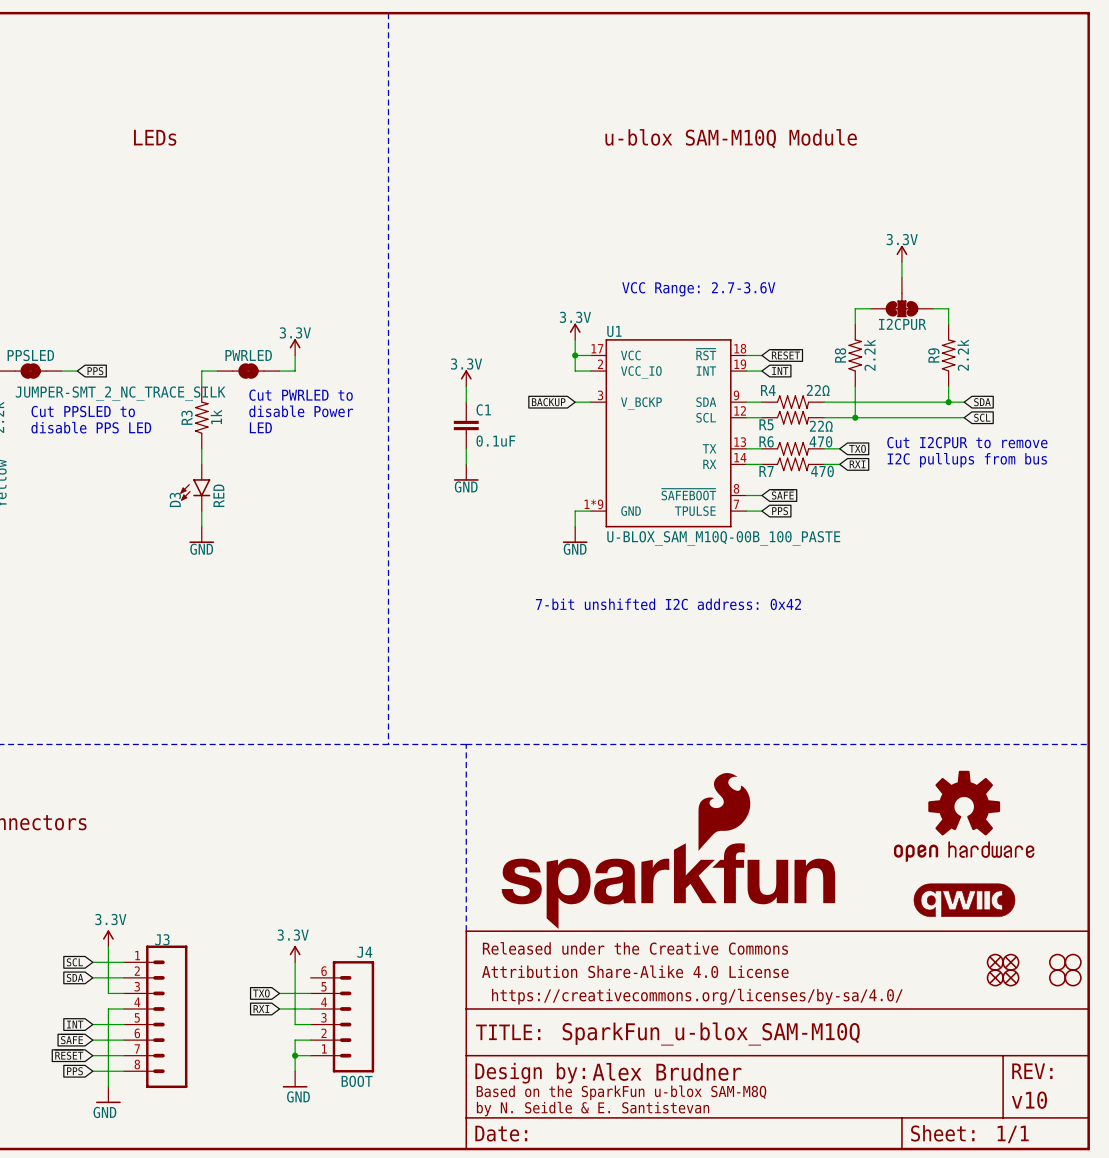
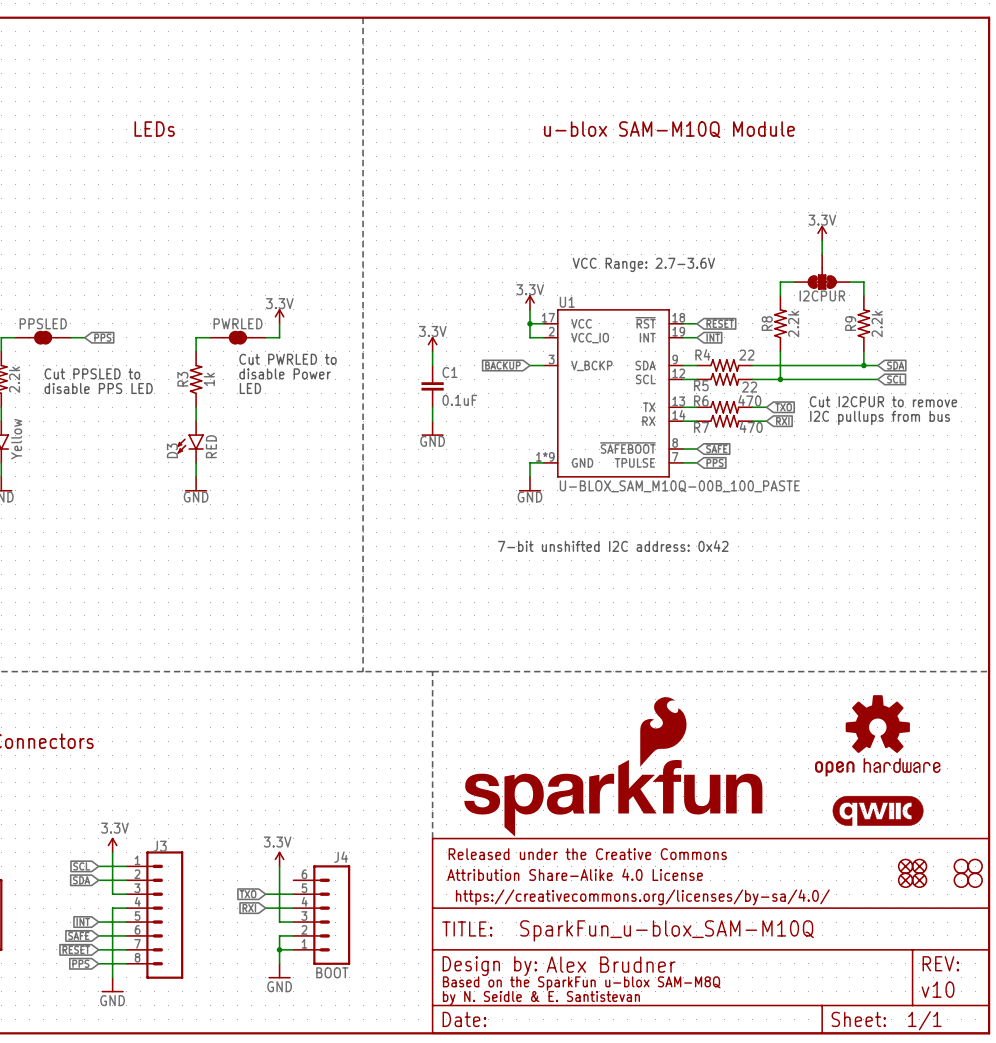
R4 value: 22Ω (818, 390) -> 22 (746, 355)
PPSLED value: JUMPER-SMT_2_NC_TRACE_SILK (120, 393) -> none
R5 value: 22Ω (821, 426) -> 22 (749, 387)

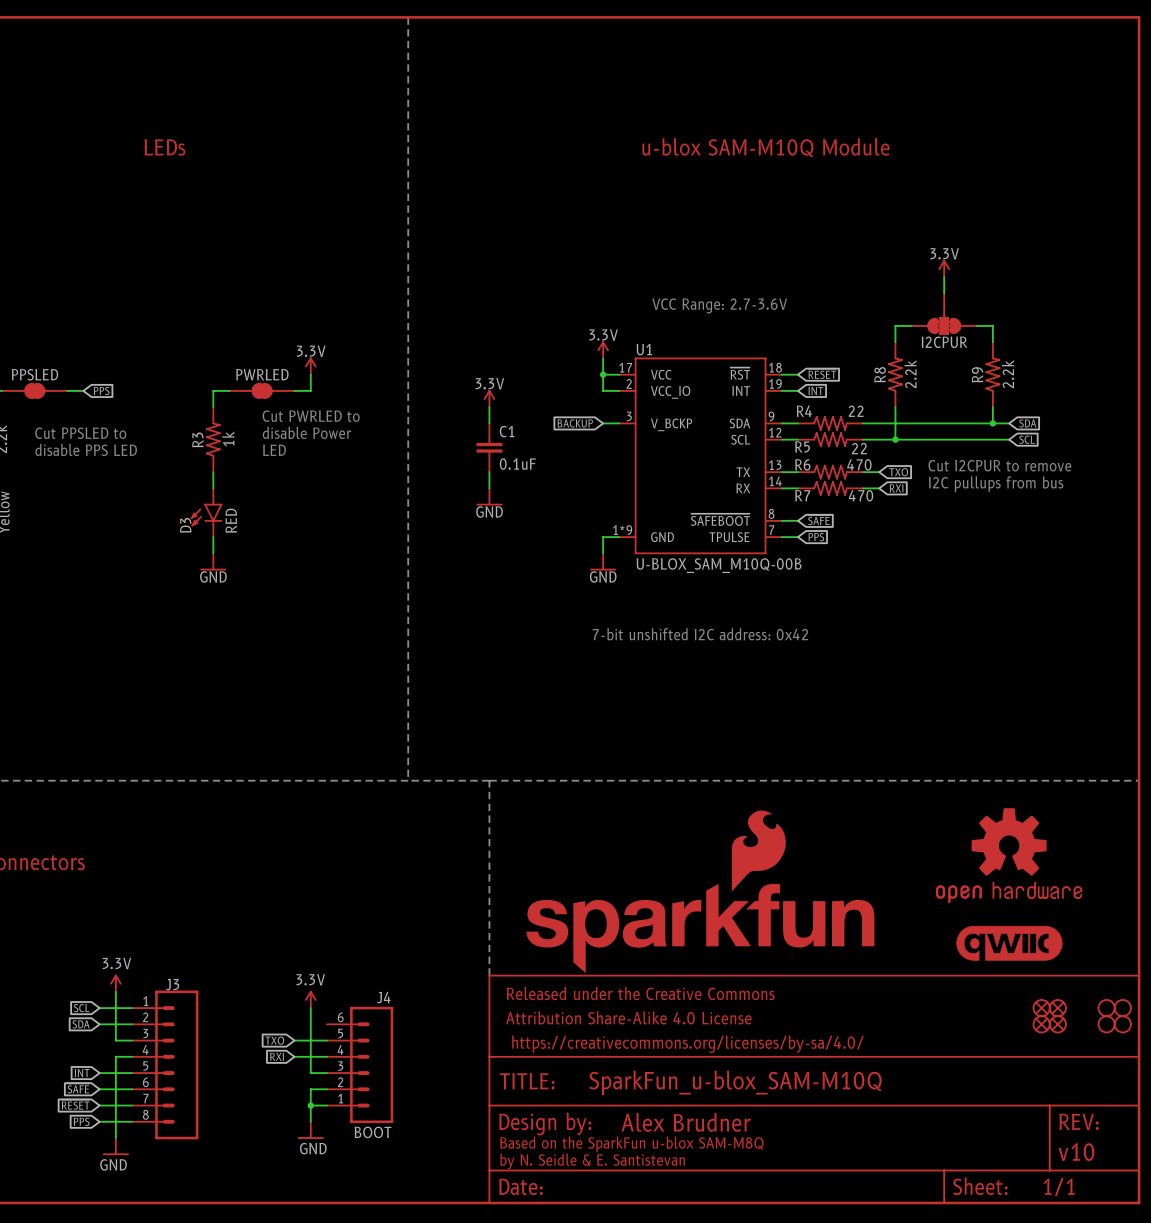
U1 value: U-BLOX_SAM_M10Q-00B_100_PASTE (679, 486) -> U-BLOX_SAM_M10Q-00B (719, 565)

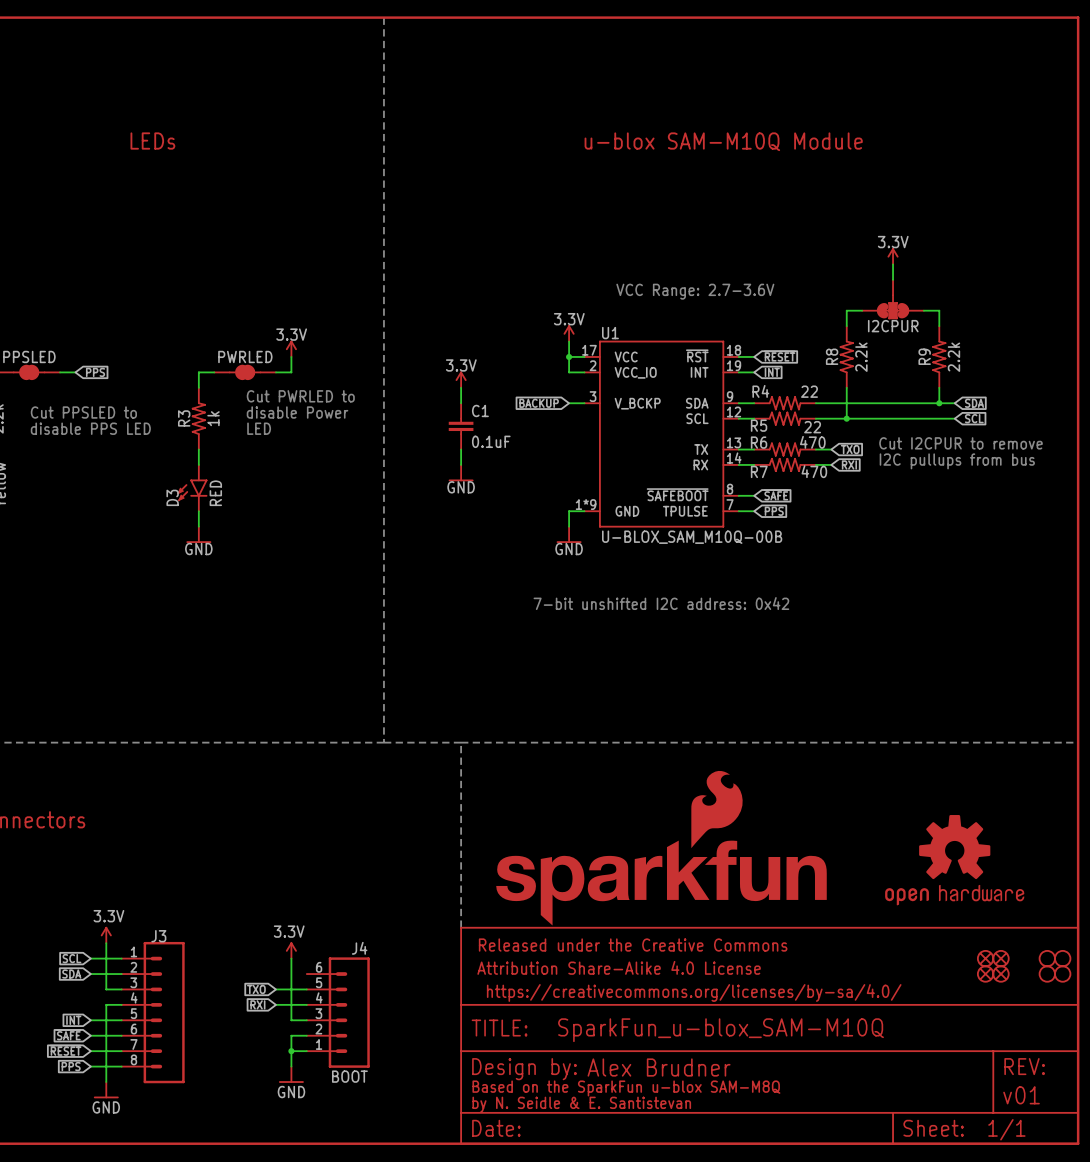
part position: (1009, 855) -> (954, 860)
part: (1009, 943) -> none
part text: v10 (1076, 1152) -> v01 (1021, 1095)

